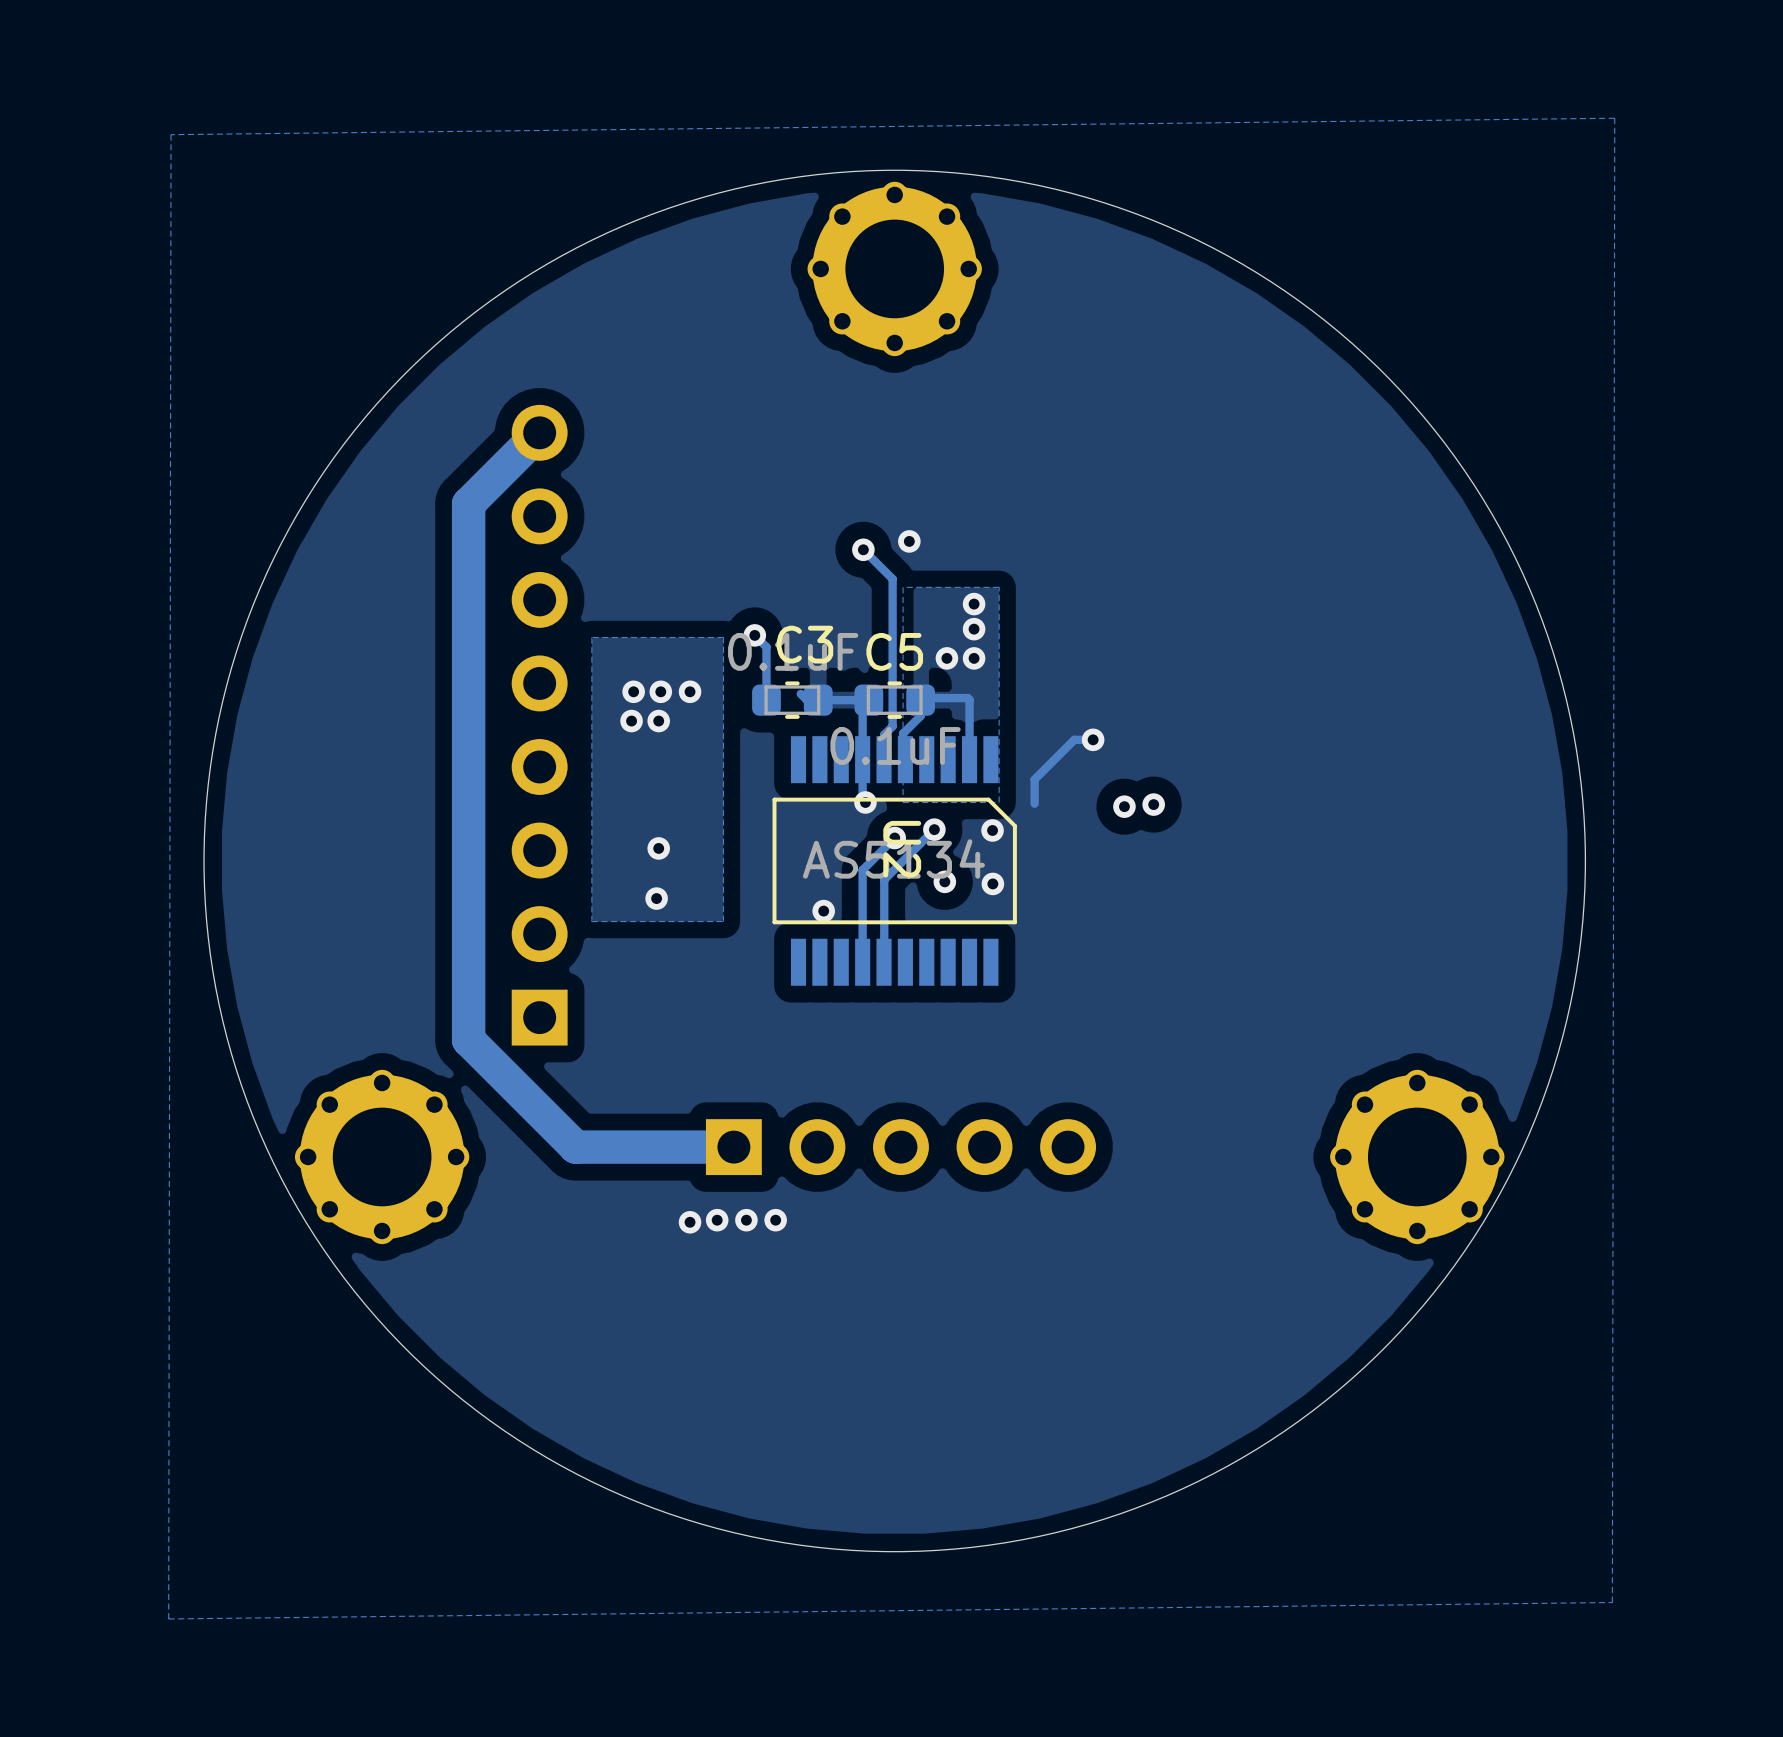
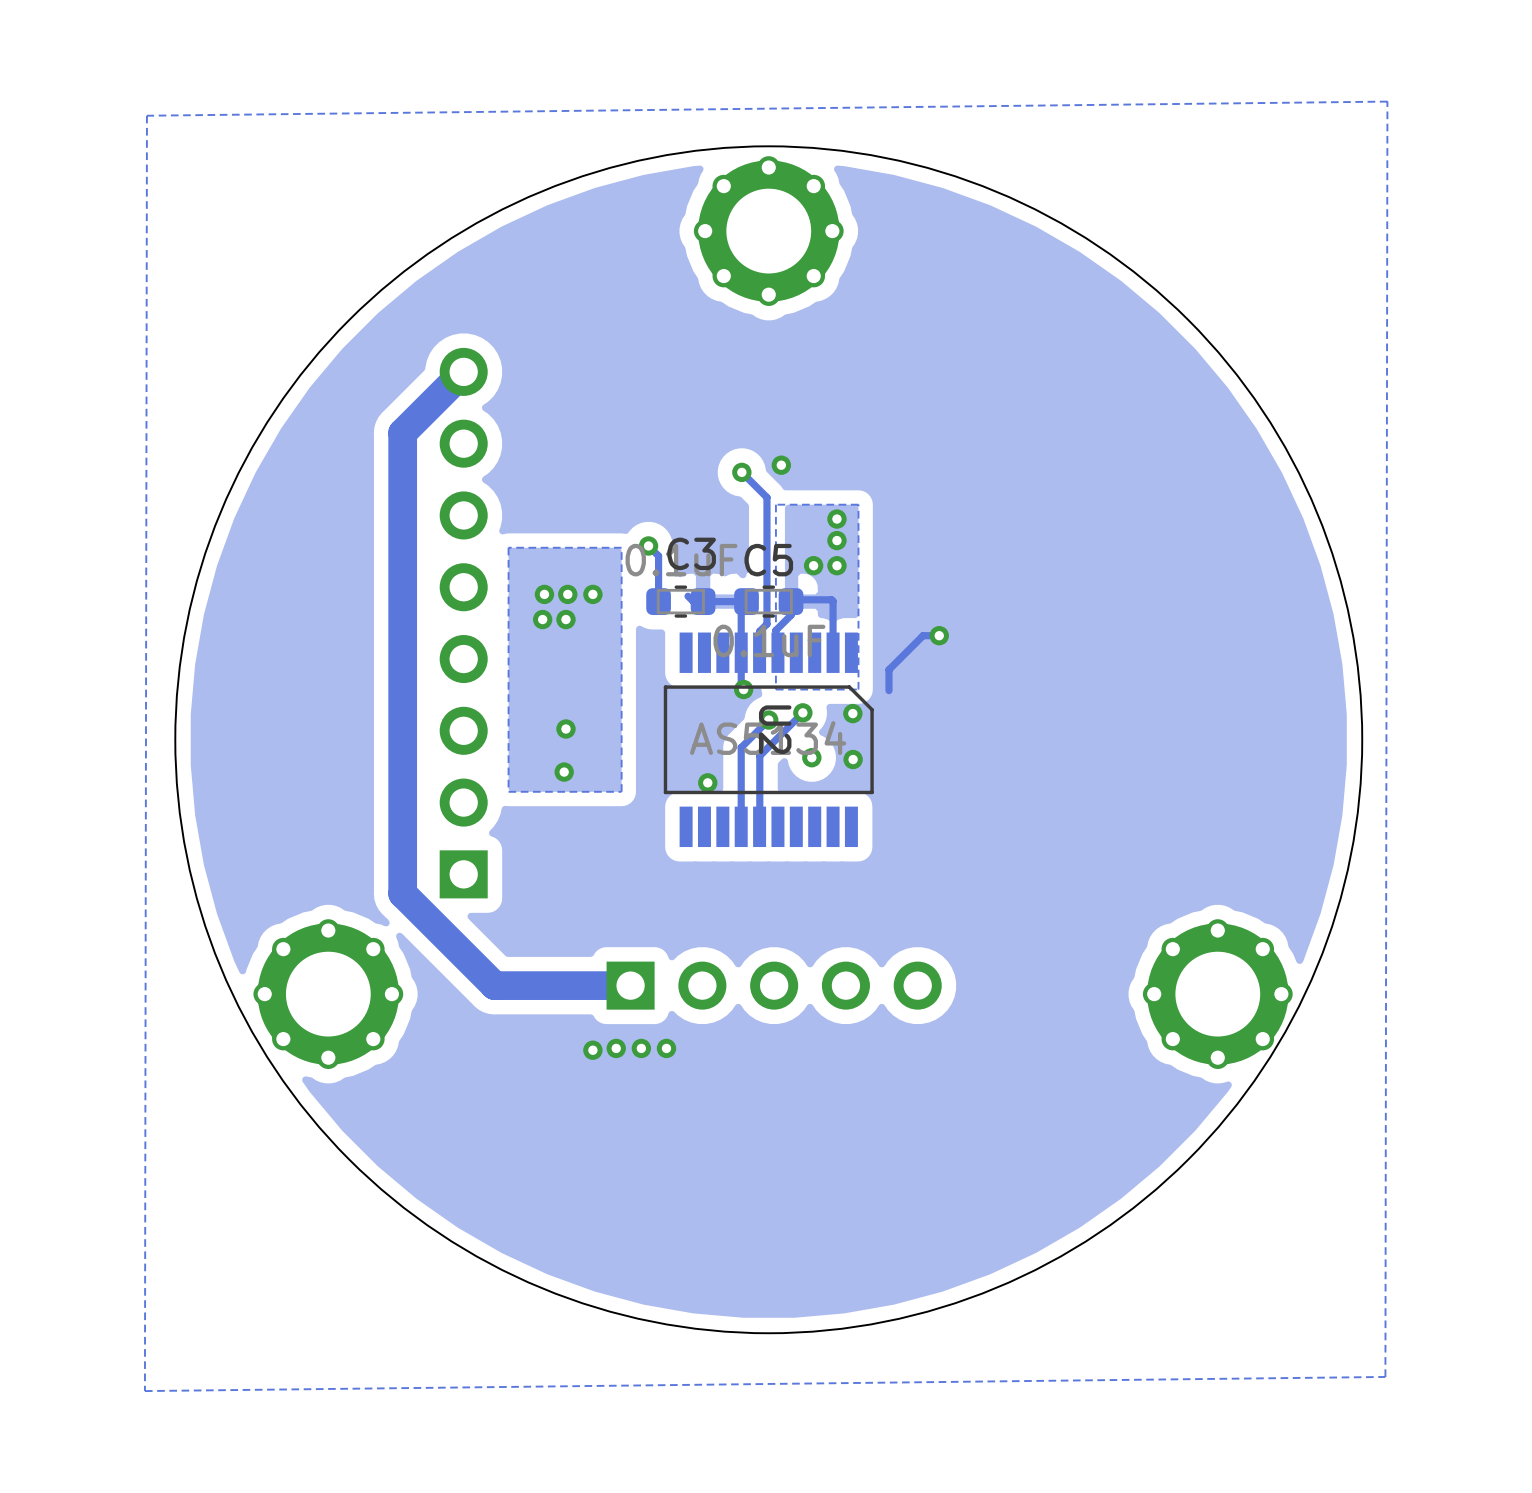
via: (1153, 804) -> none
via: (1124, 806) -> none

